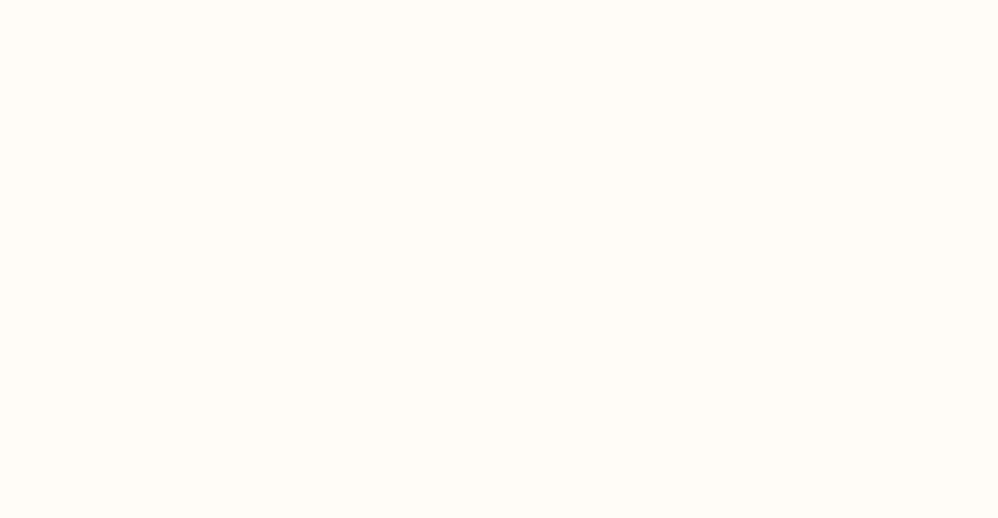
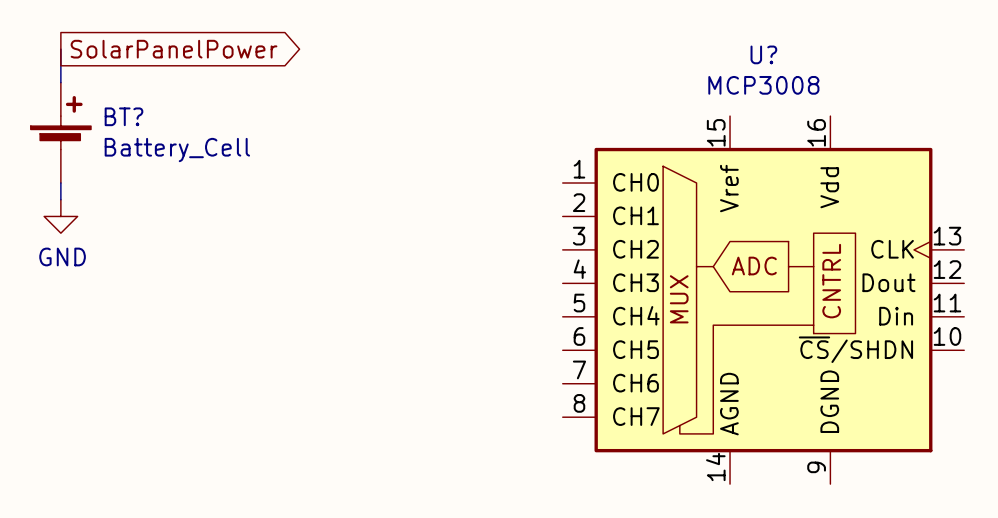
wire: none -> (60, 49) (60, 82)
global label: none -> SolarPanelPower (174, 49)
BT?: none -> Battery_Cell (60, 132)
wire: none -> (60, 183) (60, 199)
power symbol: none -> GND (60, 216)
U?: none -> MCP3008 (763, 300)

